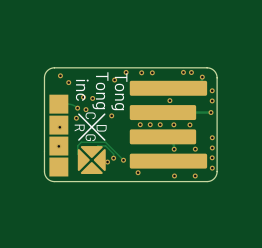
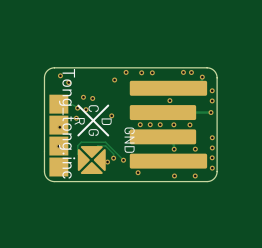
part footprint: [49, 94, 106, 177] -> [49, 94, 110, 177]

